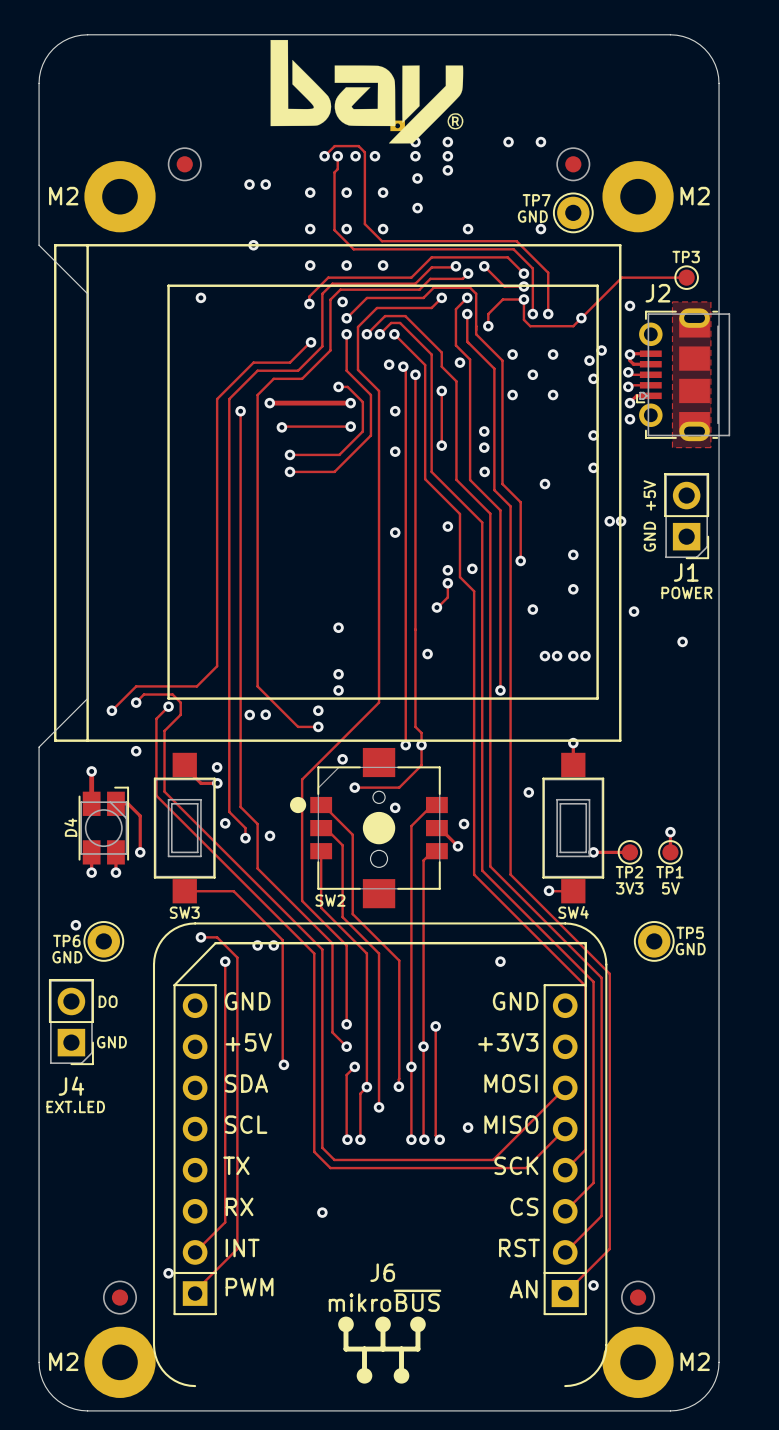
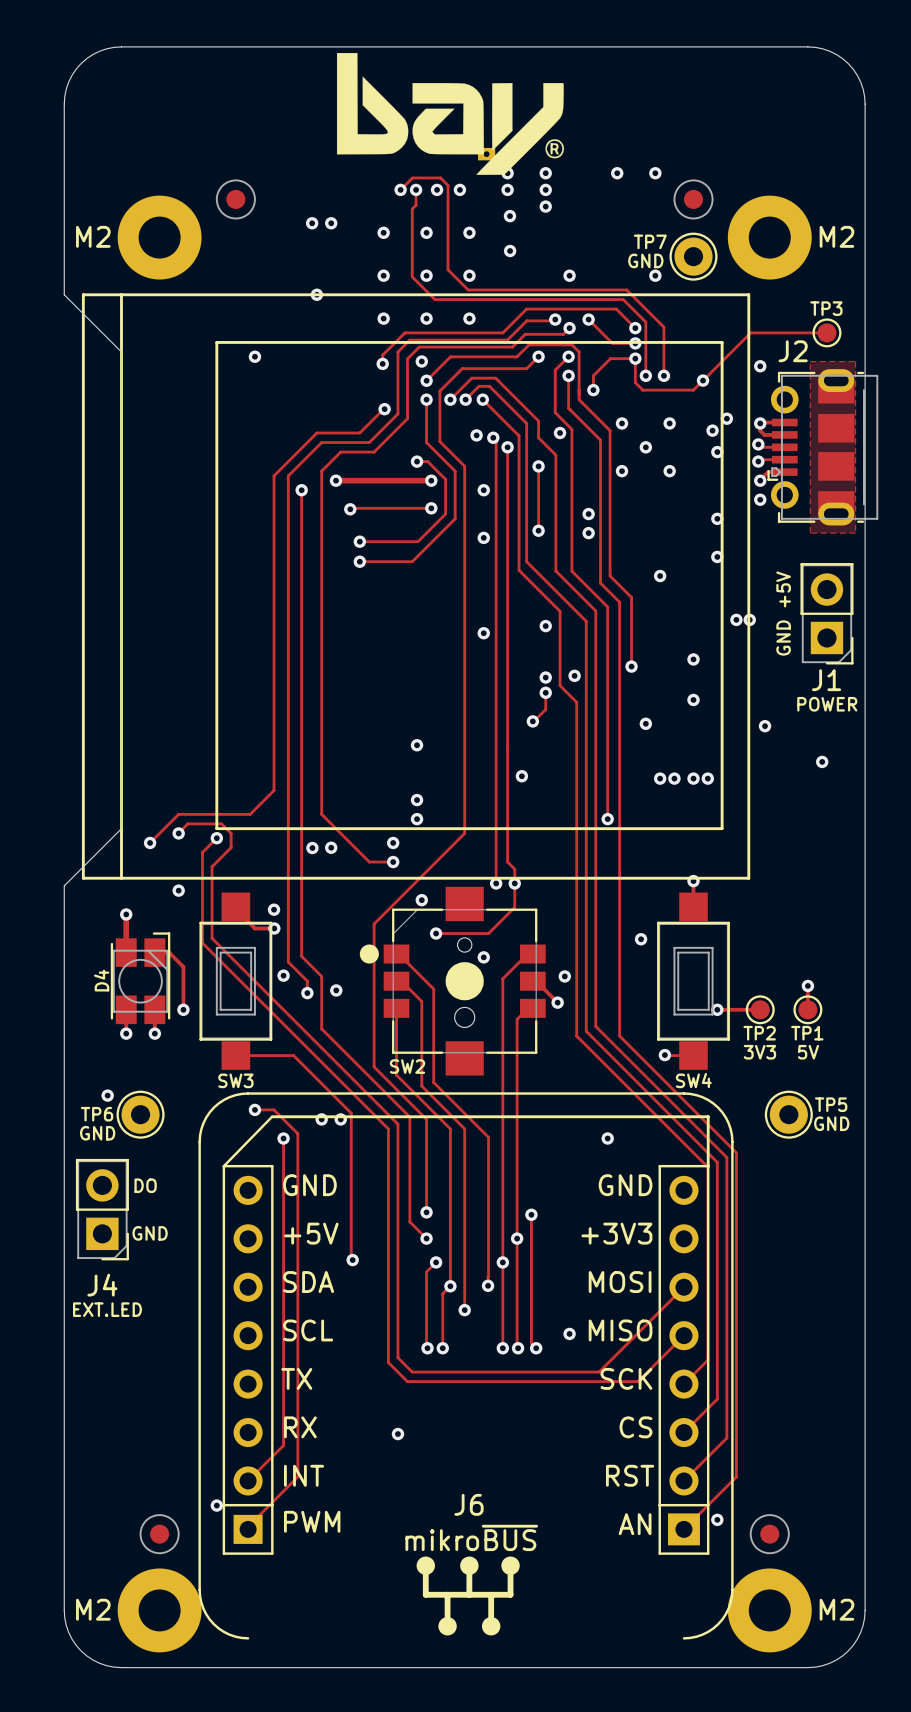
via: (484, 471) -> none

